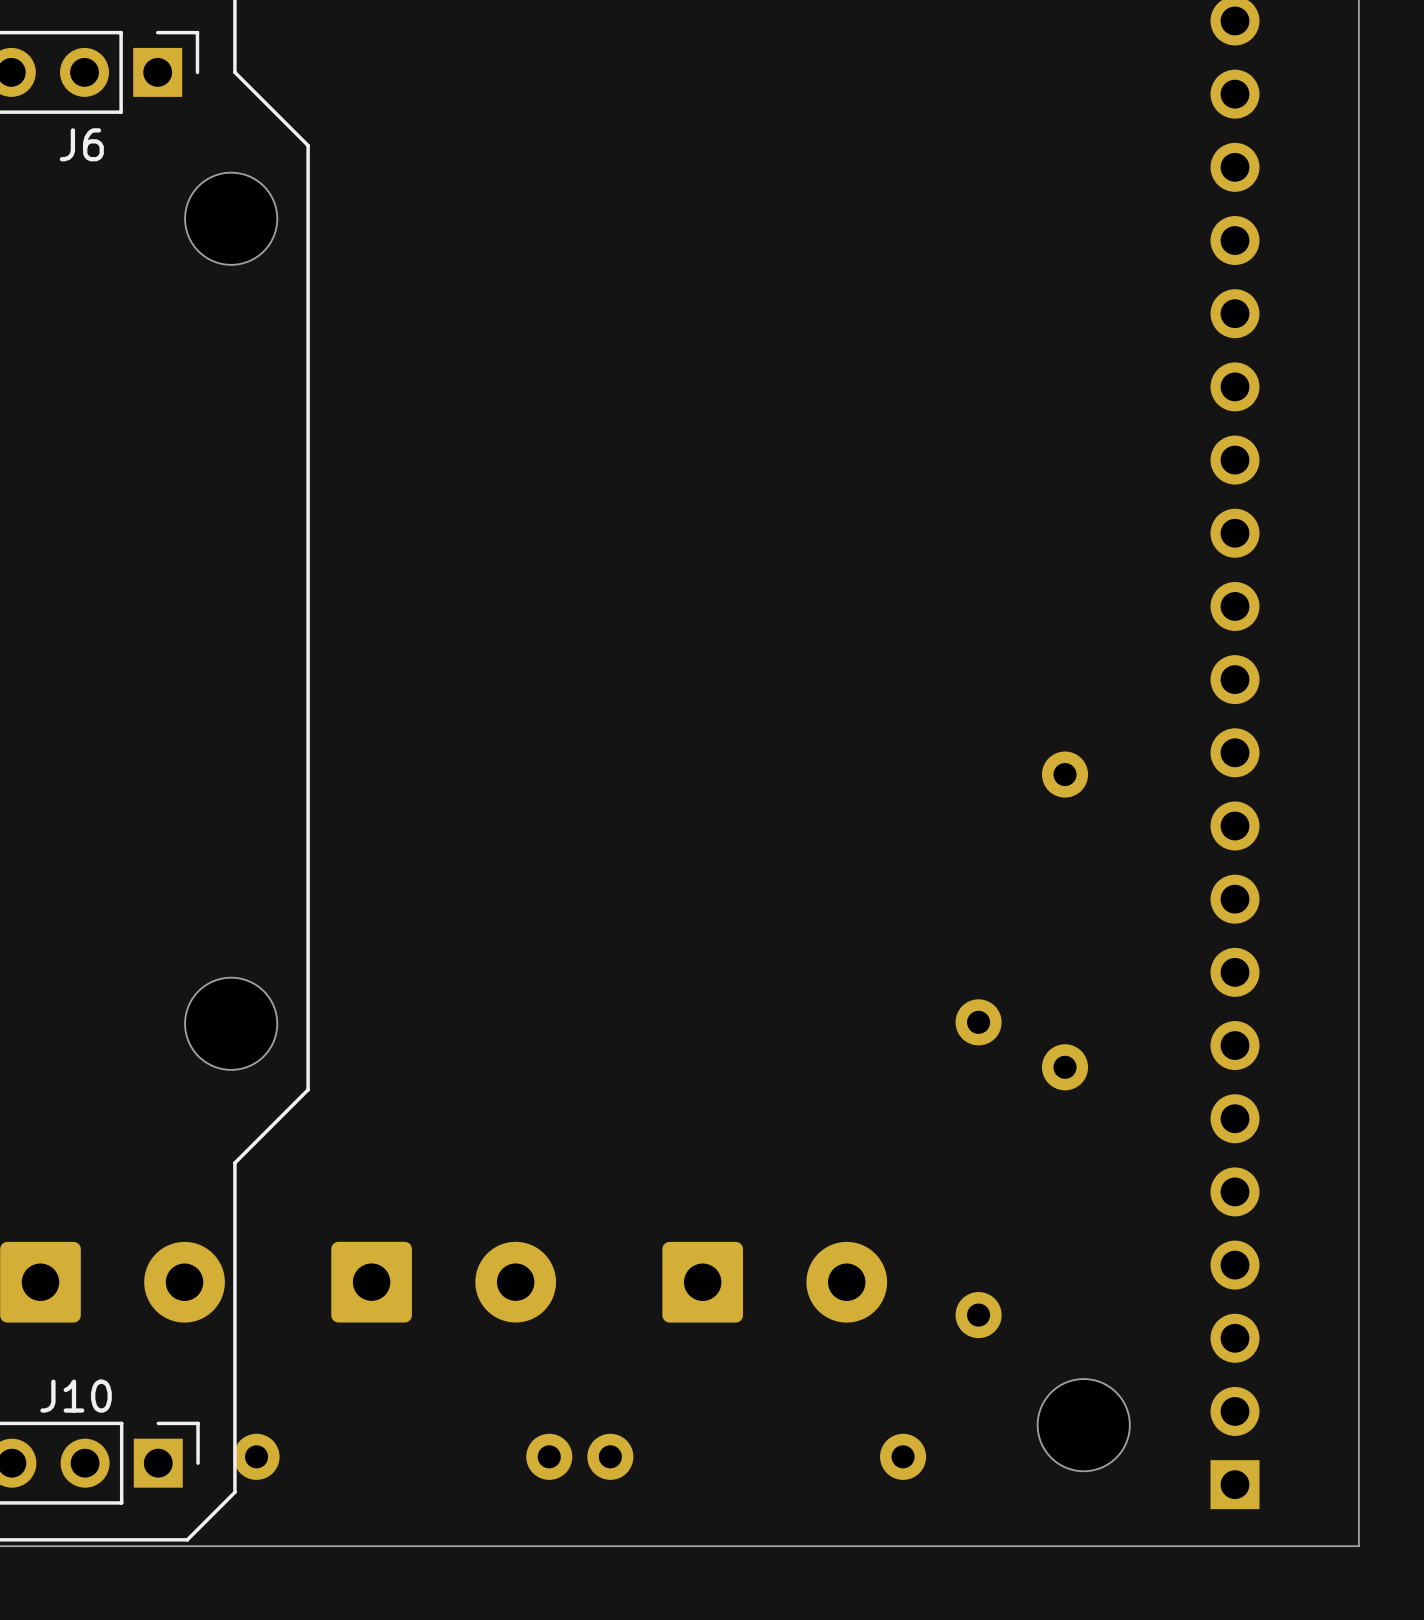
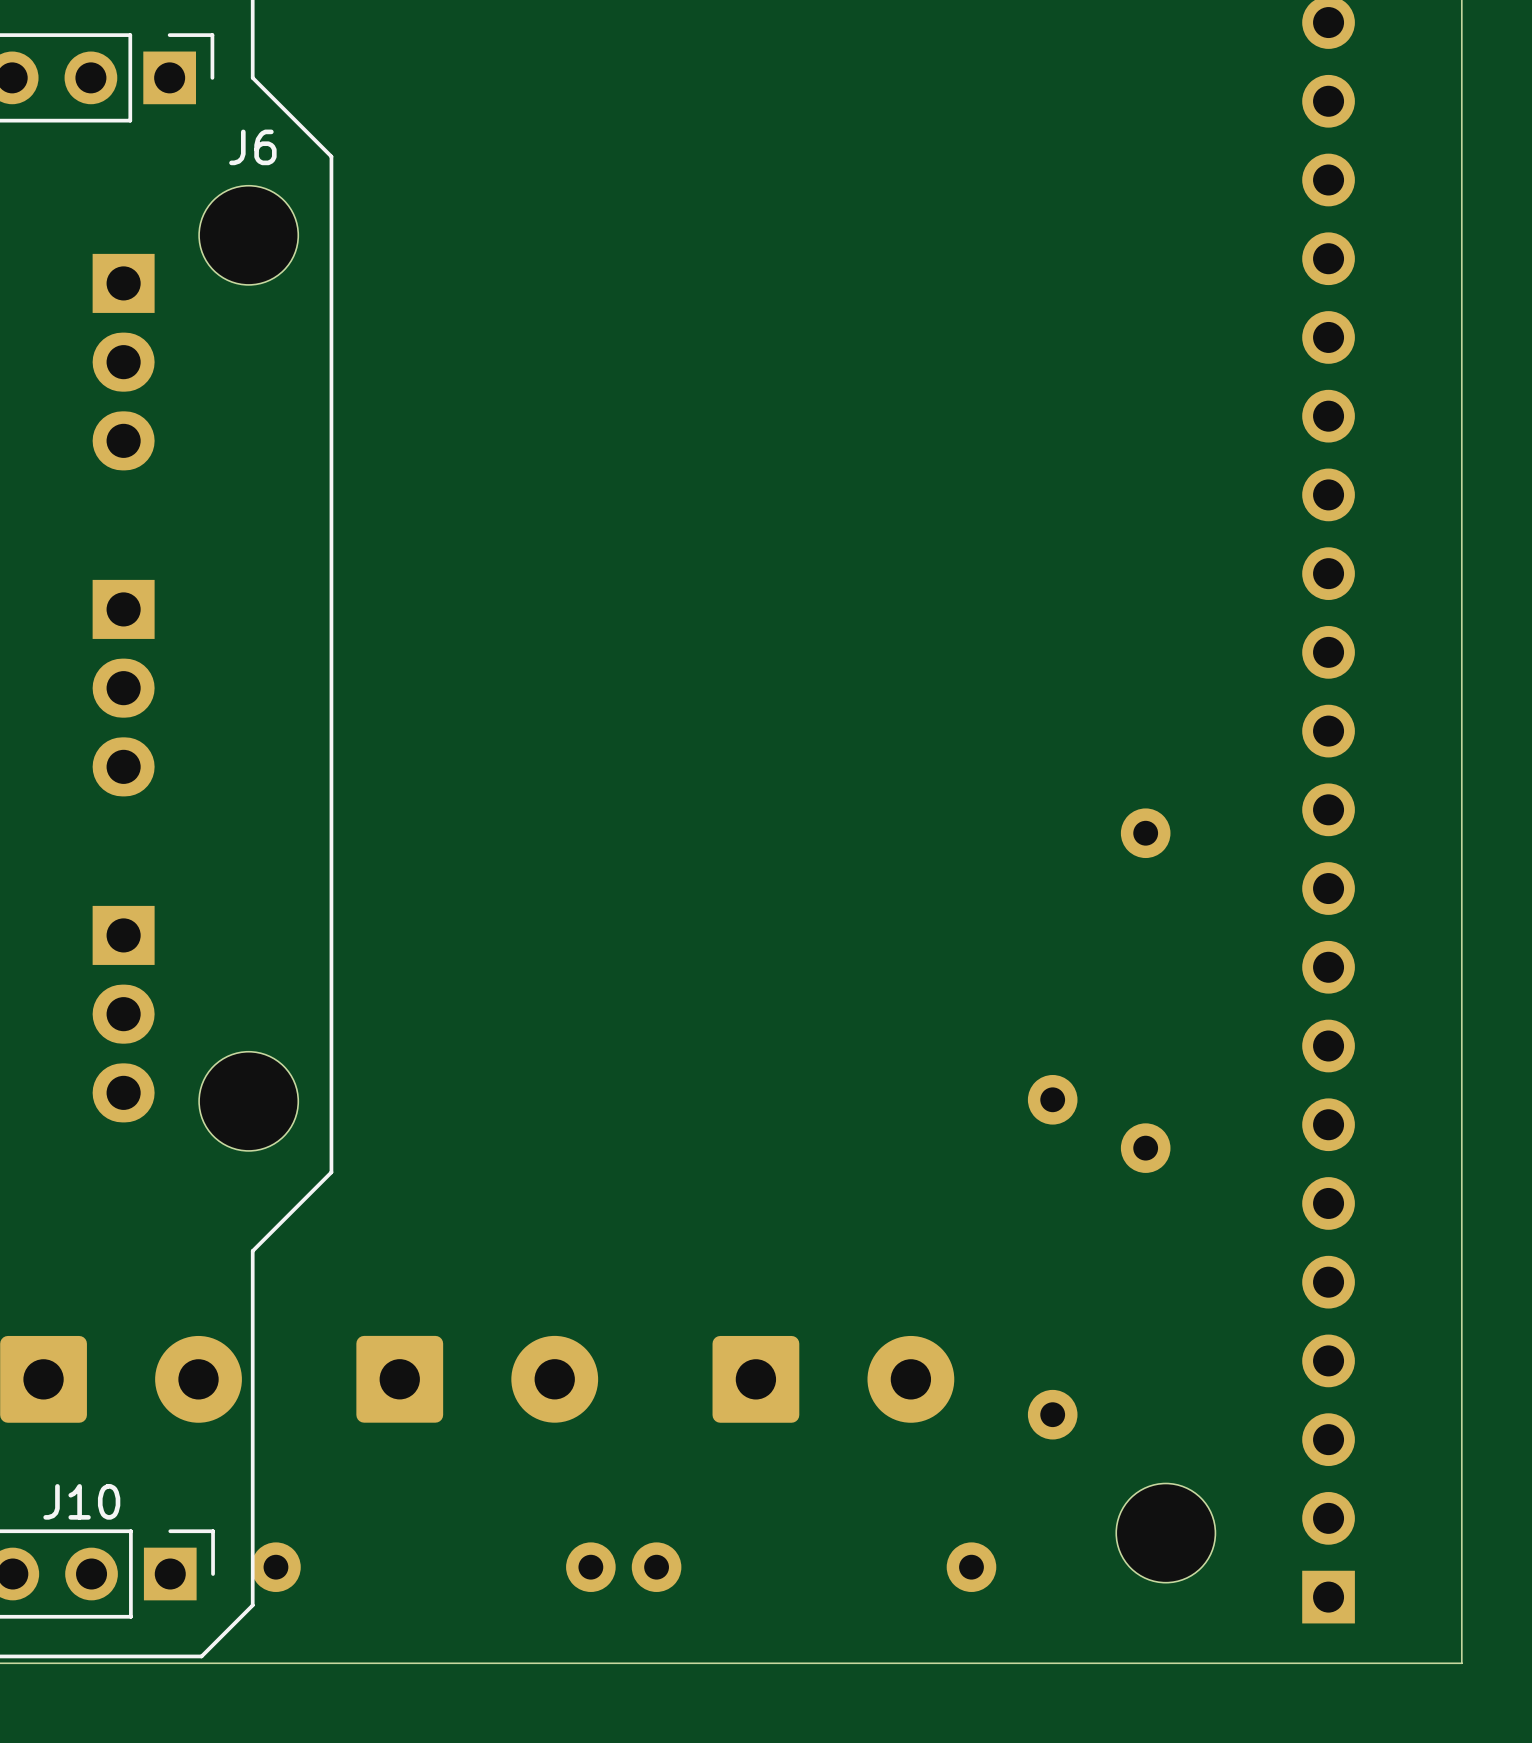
J6 name position: J6 (81, 144) -> J6 (252, 147)
part: none -> (123, 362)
part: none -> (123, 688)
part: none -> (123, 1014)

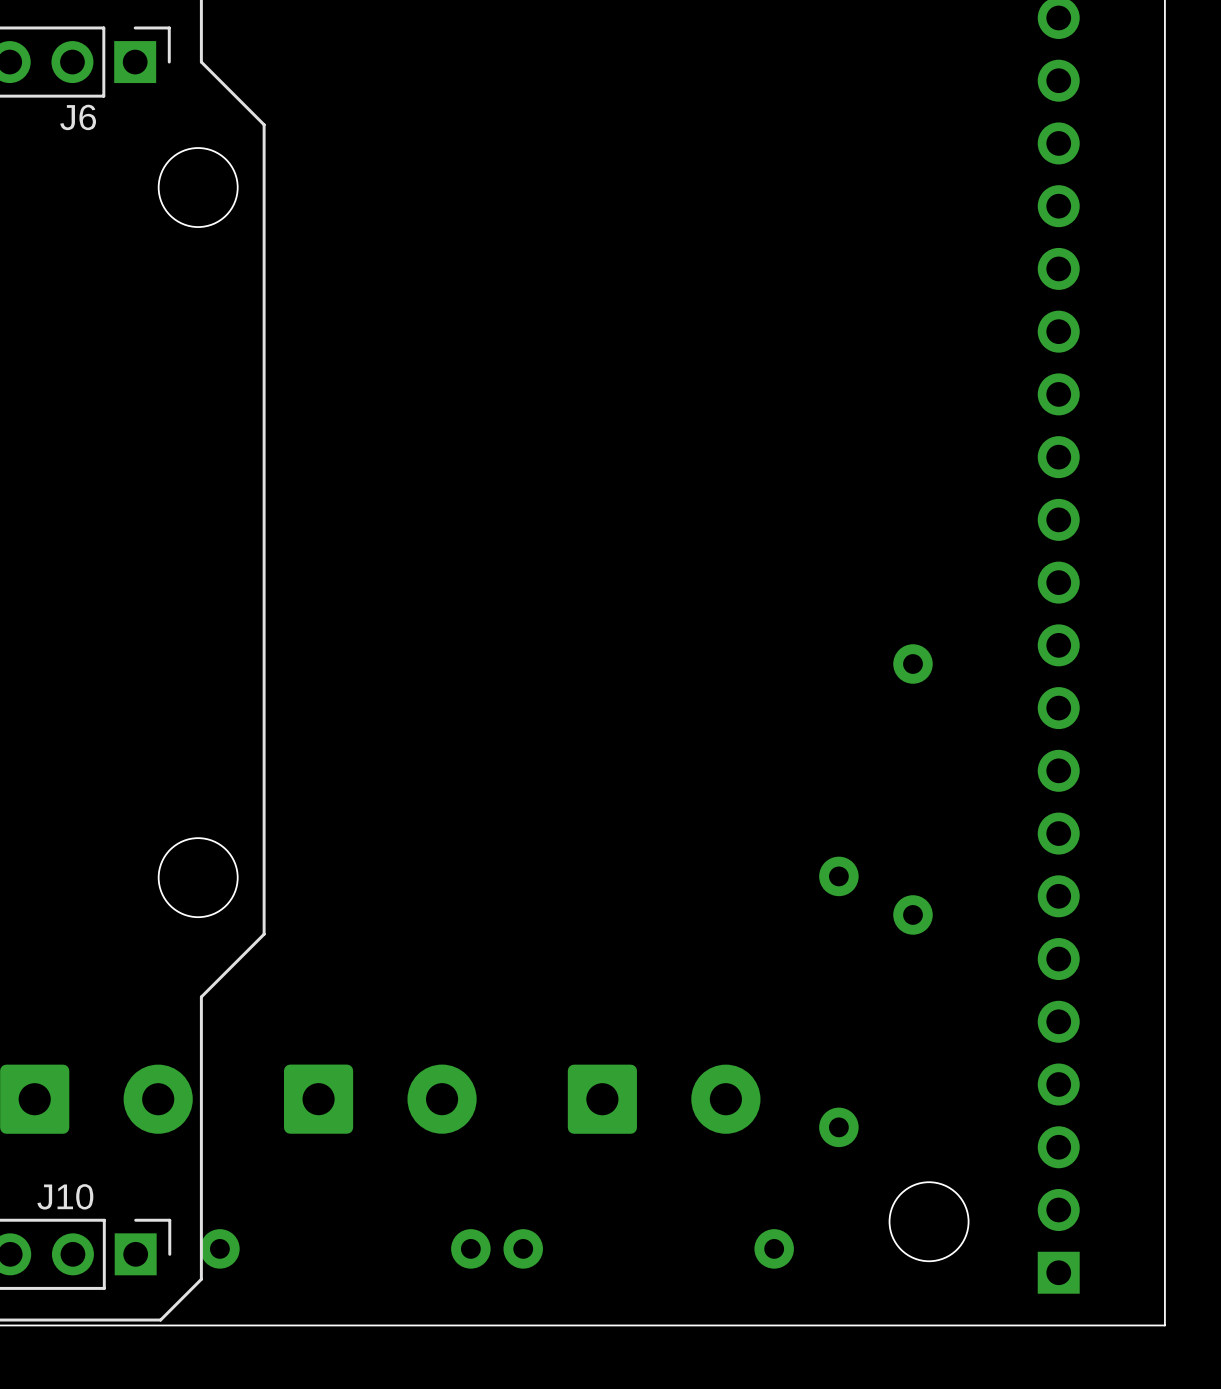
J6 name position: J6 (252, 147) -> J6 (78, 117)
part: (123, 362) -> none
part: (123, 688) -> none
part: (123, 1014) -> none

